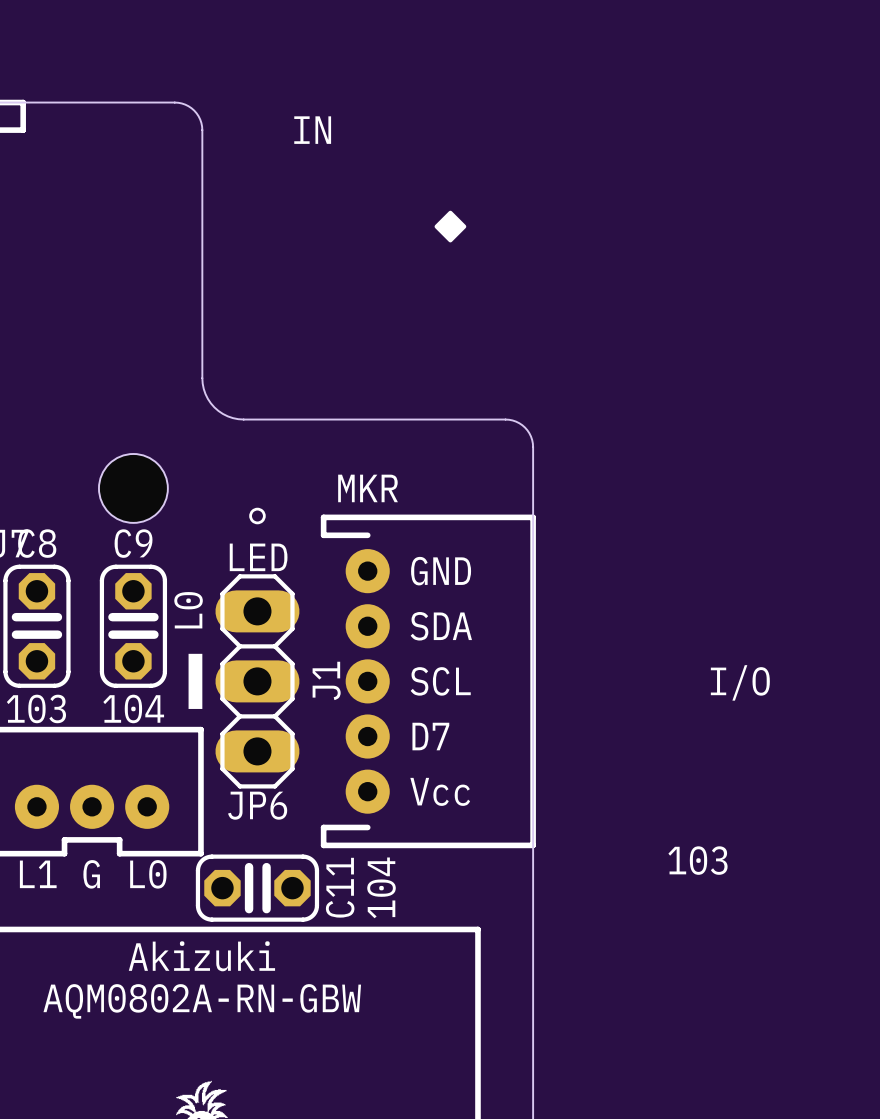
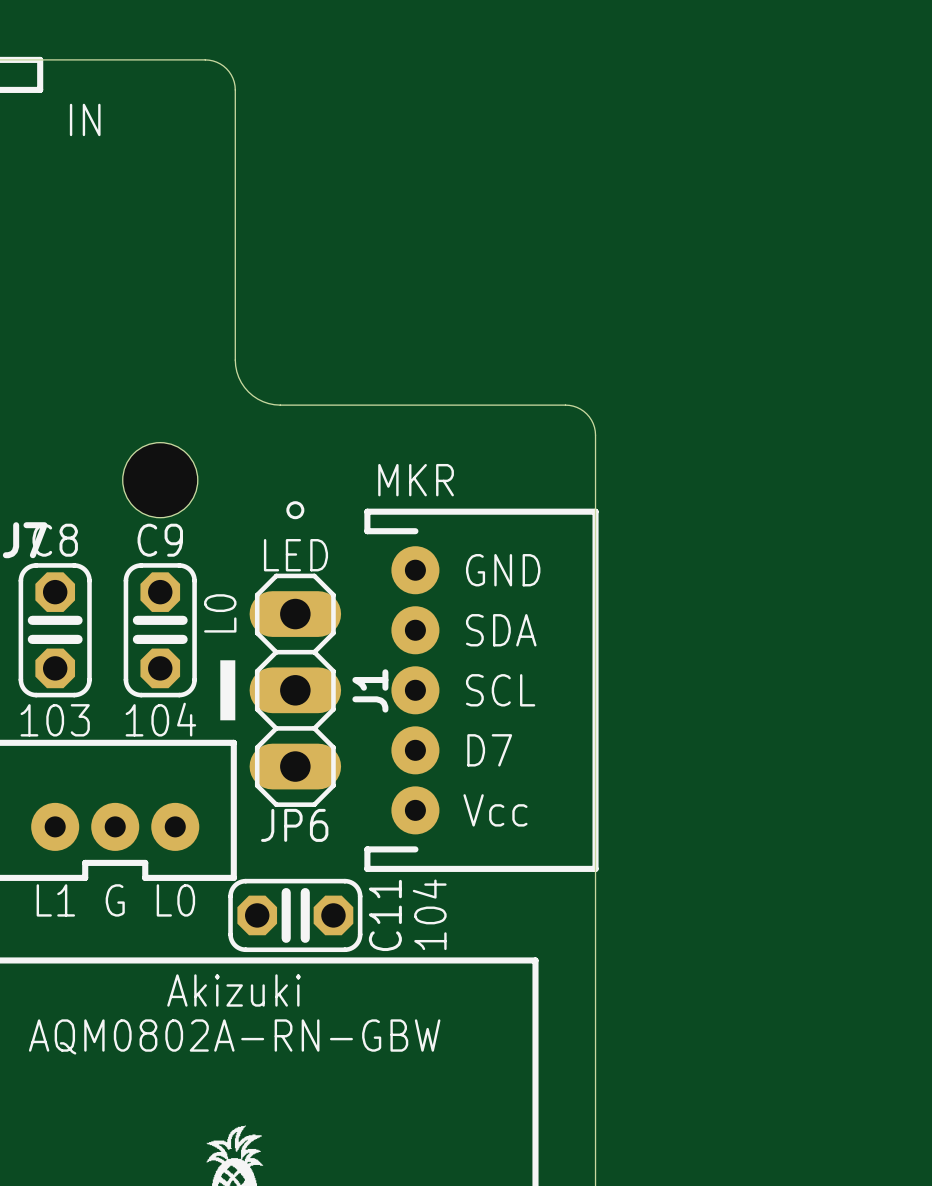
text position: IN (312, 130) -> IN (85, 119)
drawing: [434, 210, 467, 243] -> none
text: I/O (740, 682) -> none
text: 103 (697, 860) -> none

